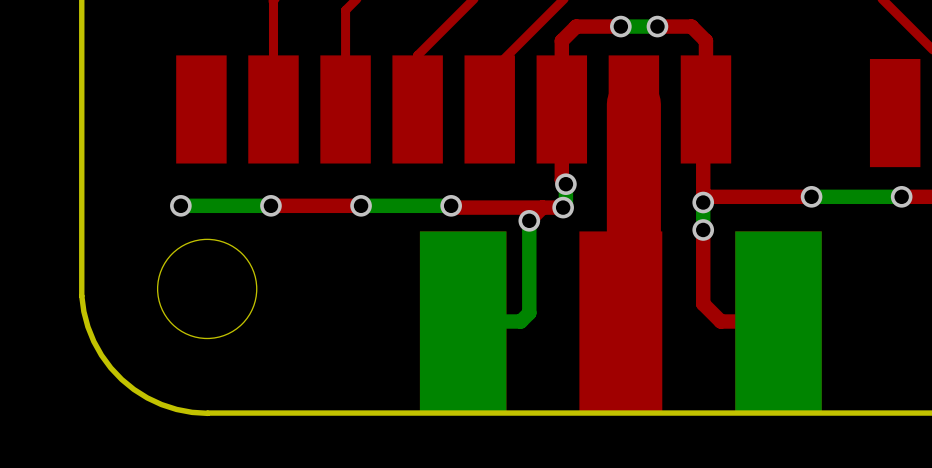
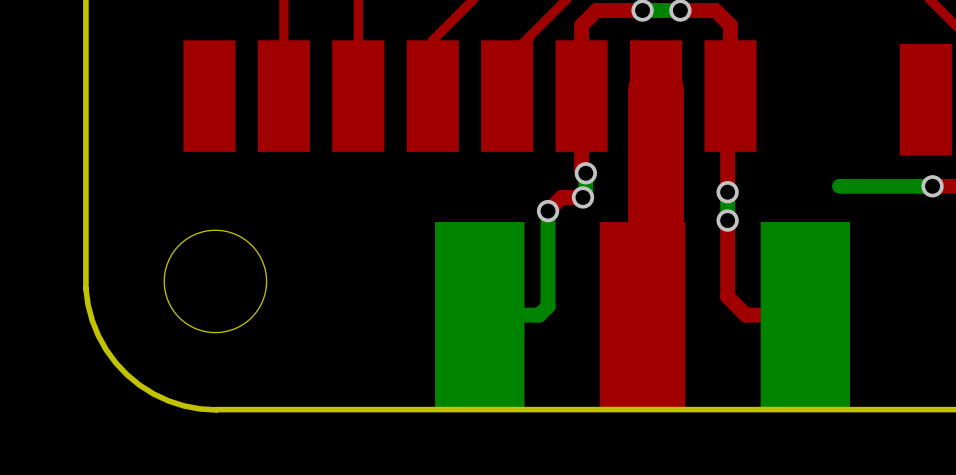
top track: (811, 196) (708, 196) (703, 202) -> none
via: (811, 196) -> none
via: (180, 205) -> none
bottom track: (270, 205) (180, 205) -> none
via: (270, 205) -> none
top track: (361, 205) (270, 205) -> none
via: (361, 205) -> none
bottom track: (451, 205) (361, 205) -> none
top track: (451, 205) (452, 207) (542, 207) -> none
via: (451, 205) -> none

